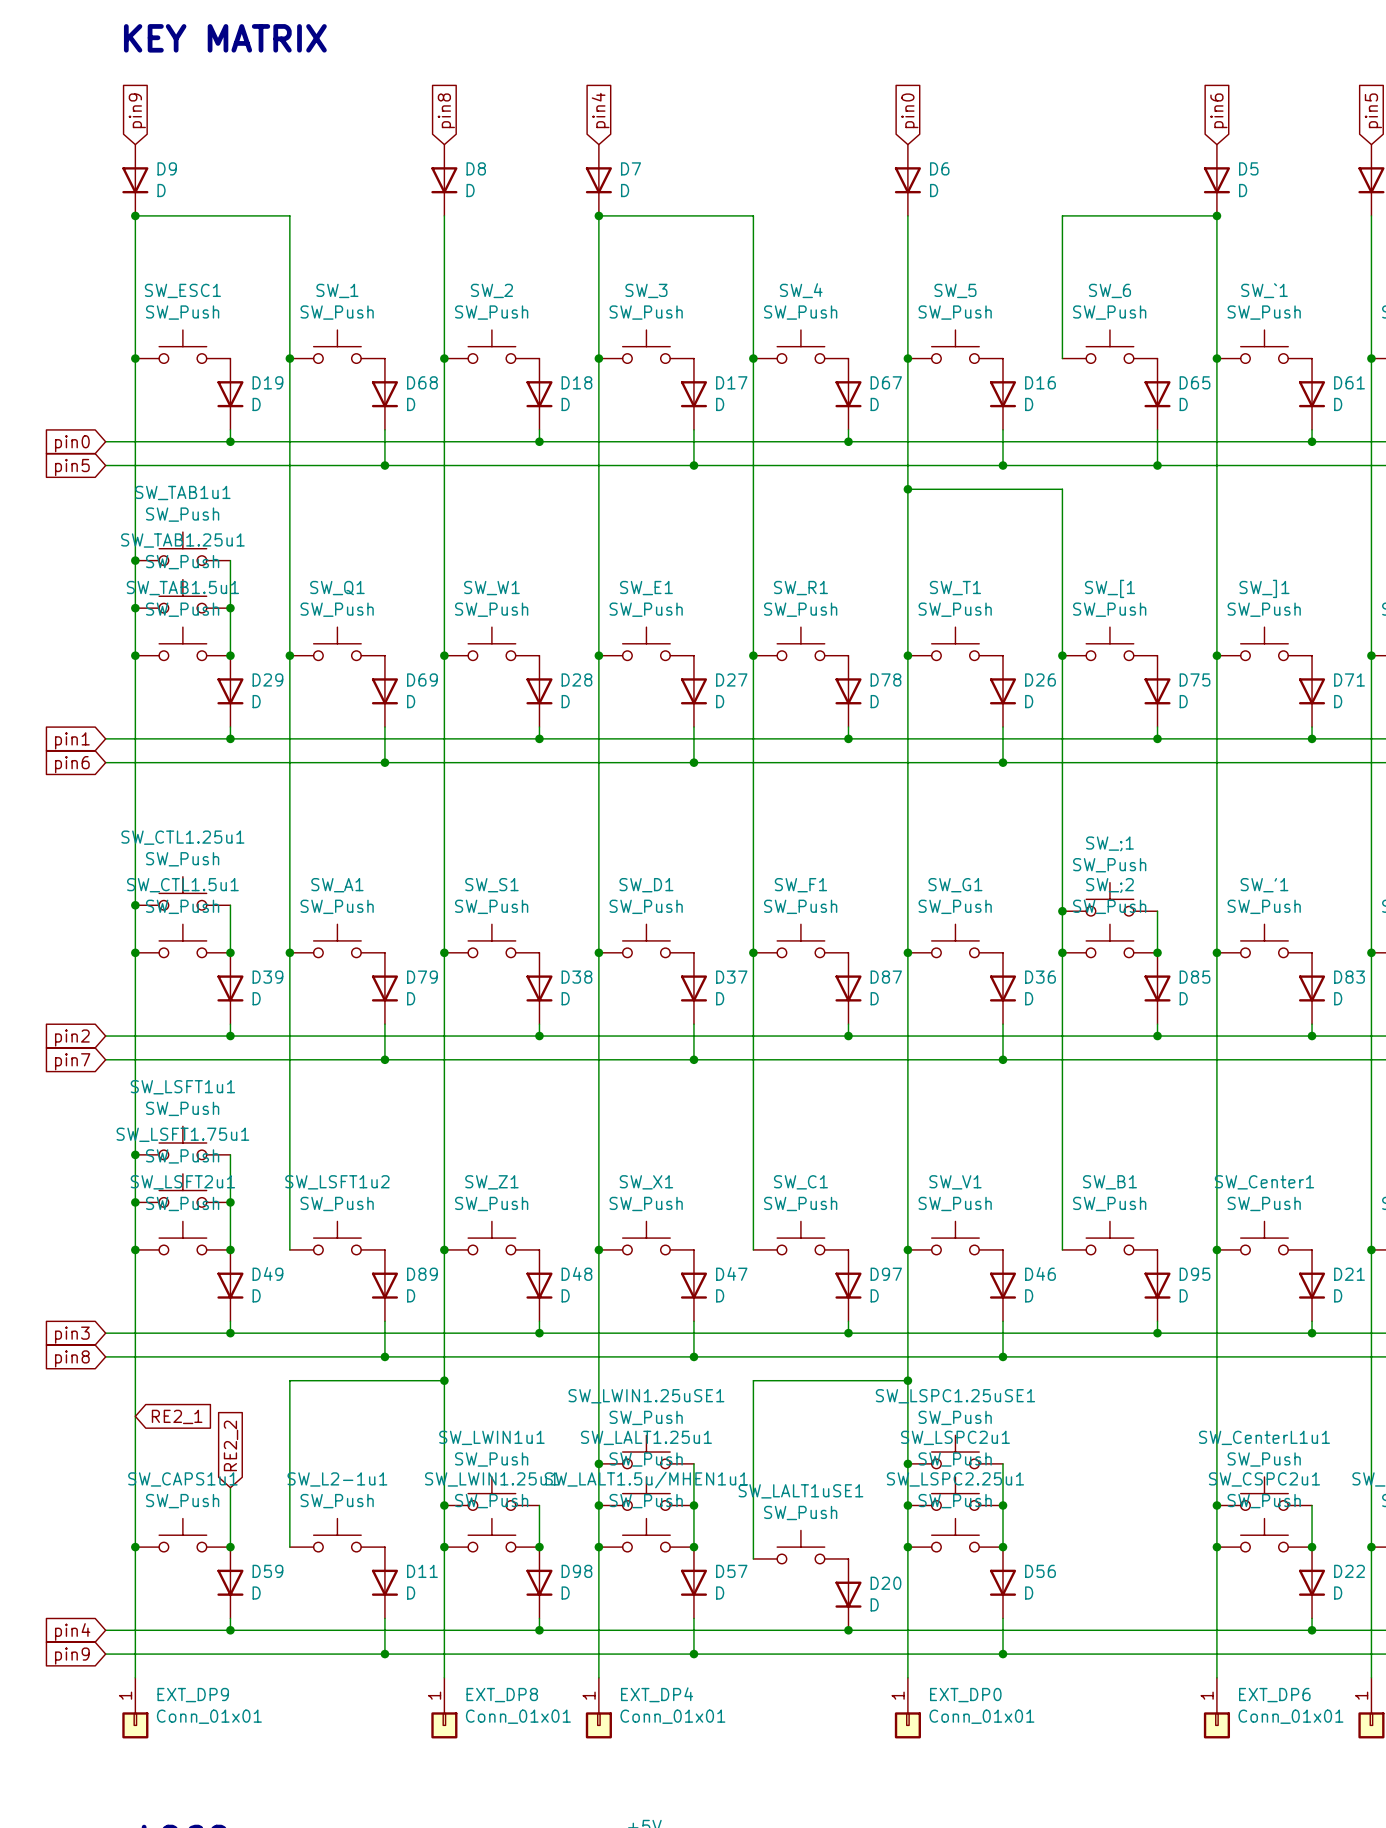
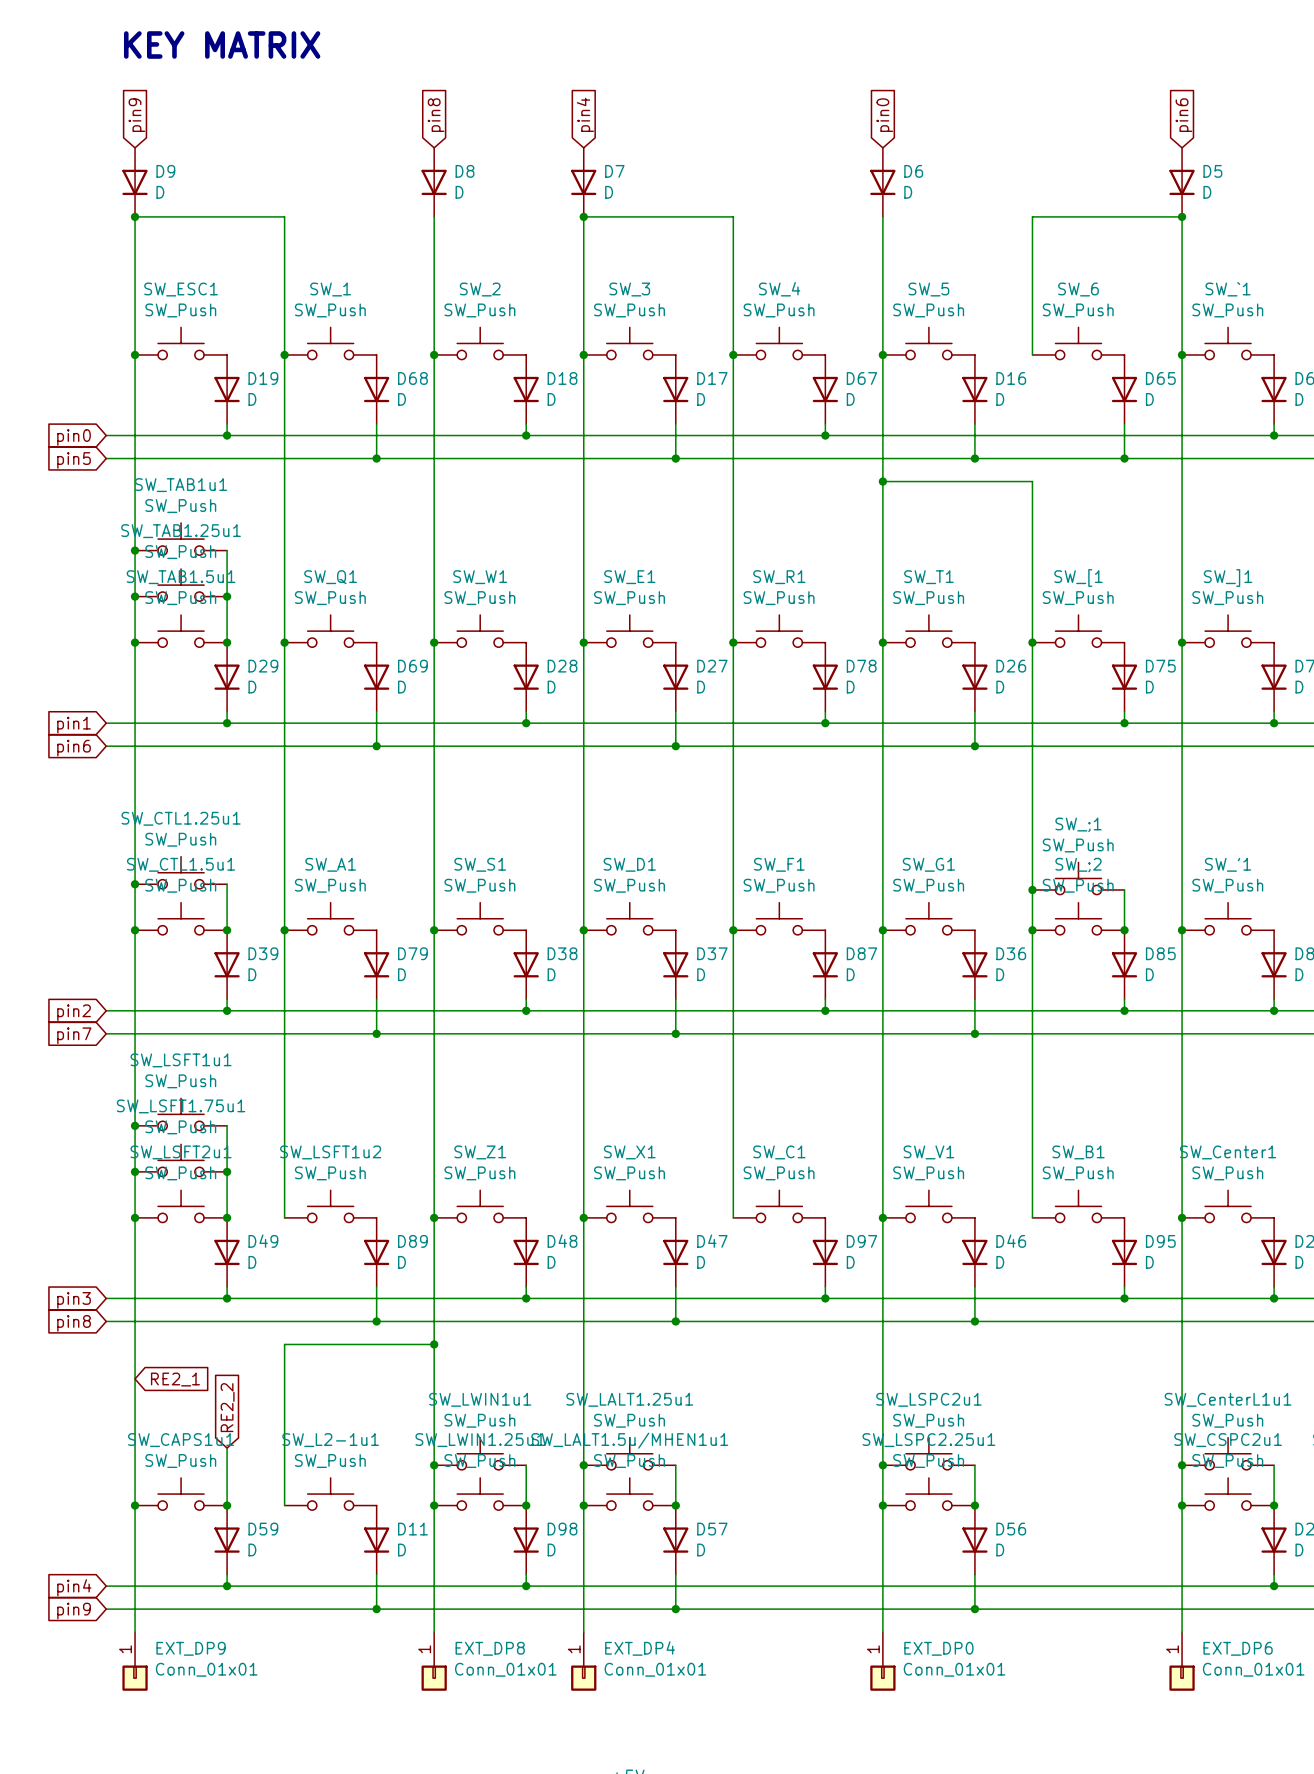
wire: (907, 1380) (753, 1380) (753, 1558) -> none
junction: (907, 1380) -> none
SW_LWIN1.25uSE1: SW_Push (646, 1452) -> none
SW_LSPC1.25uSE1: SW_Push (955, 1452) -> none
junction: (598, 1463) -> none
wire: (693, 1463) (693, 1505) -> none
junction: (907, 1463) -> none
wire: (1002, 1463) (1002, 1505) -> none
junction: (693, 1505) -> none
junction: (1002, 1505) -> none
SW_LALT1uSE1: SW_Push (800, 1547) -> none
D20: D (848, 1594) -> none
junction: (848, 1630) -> none

